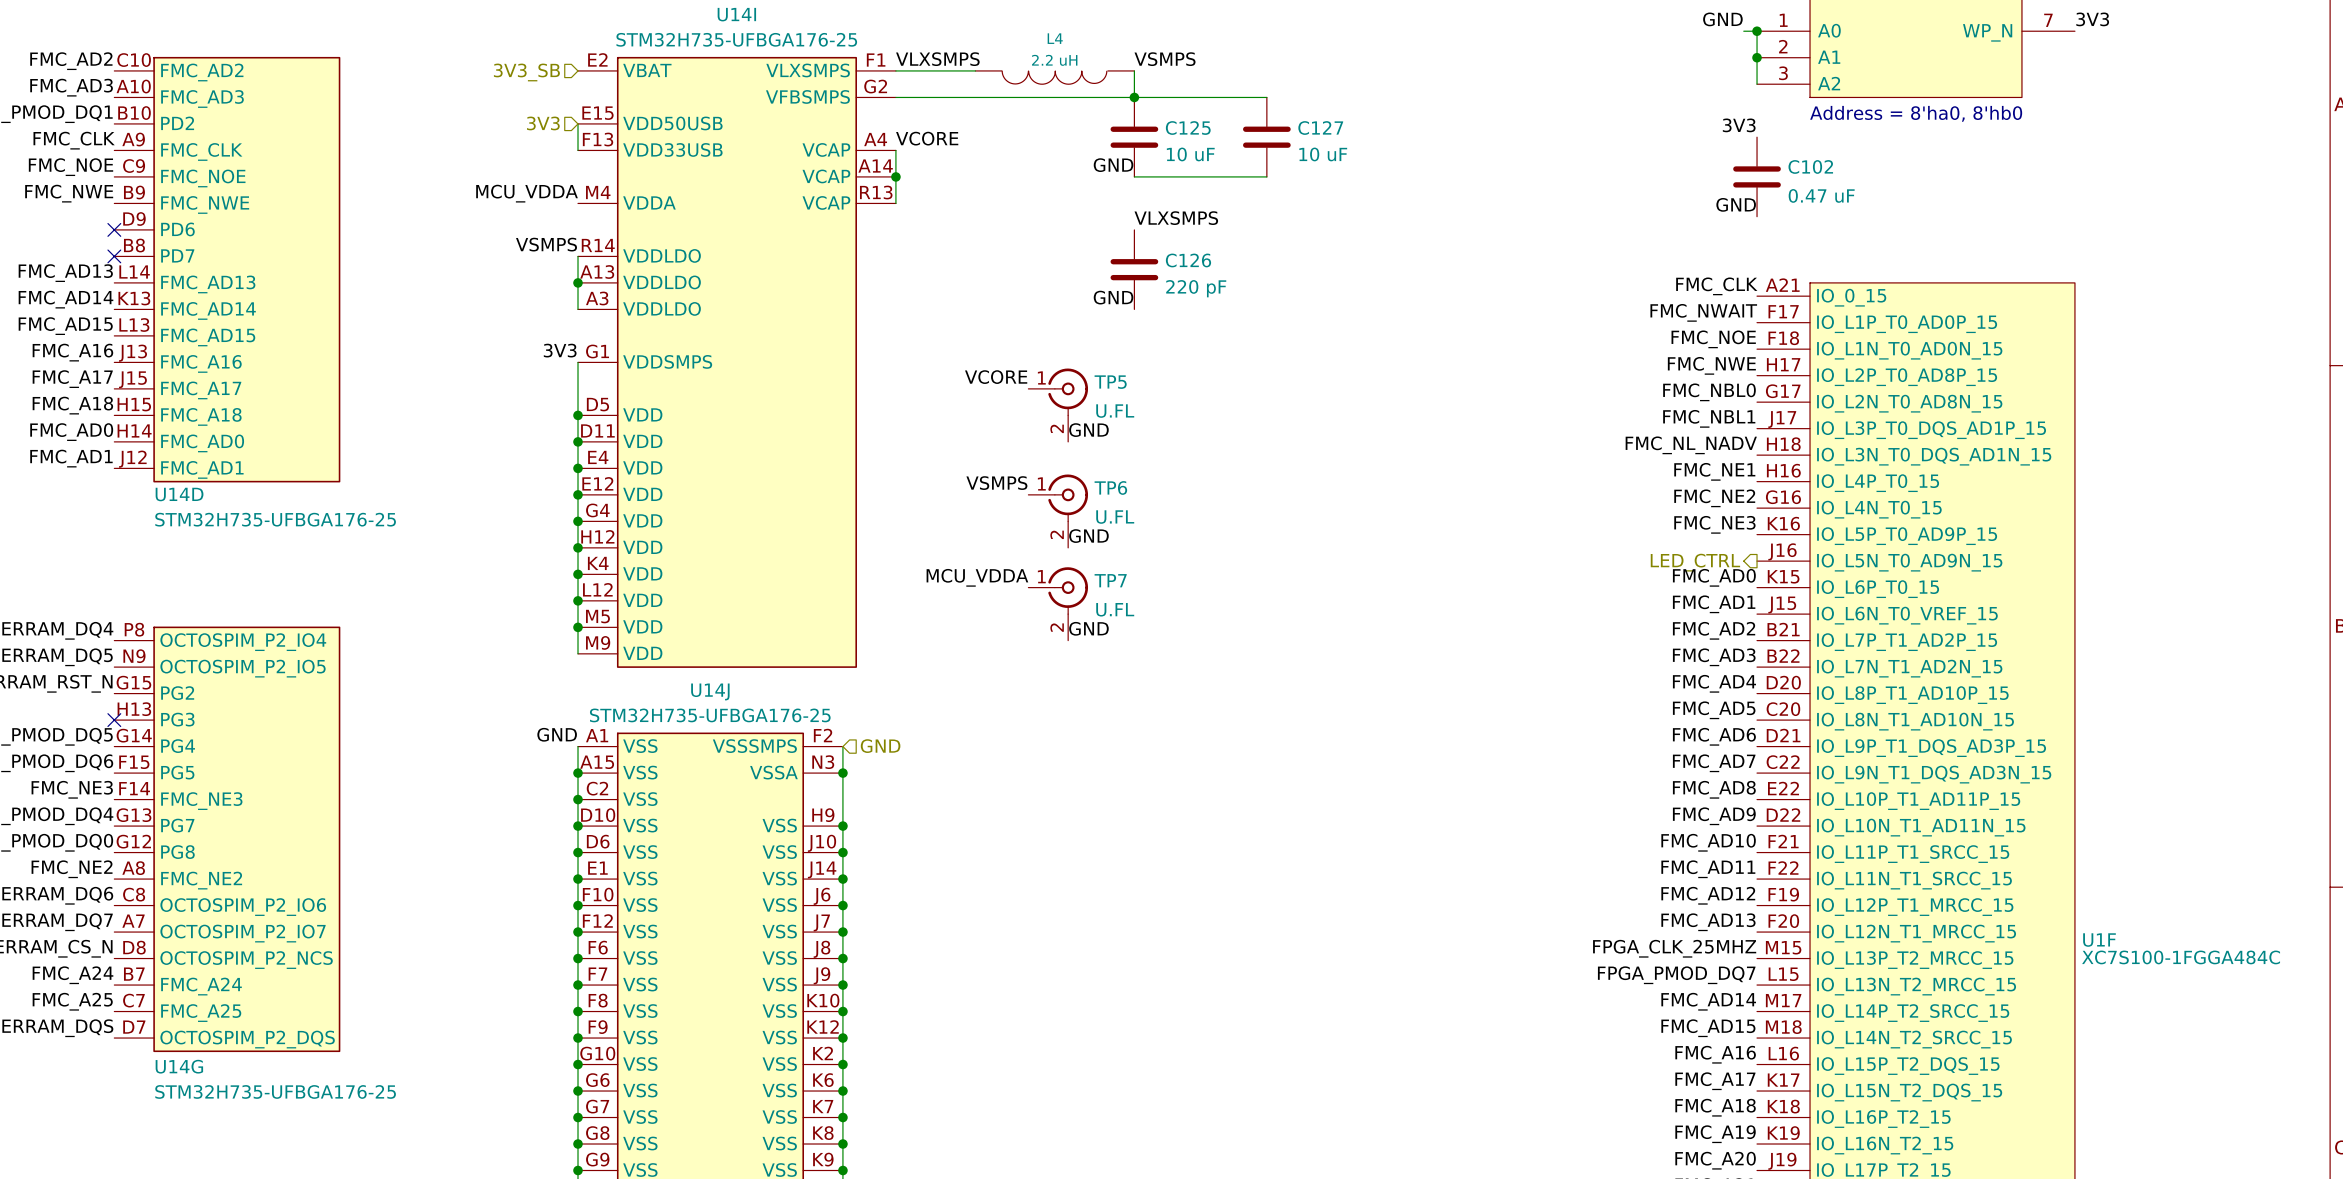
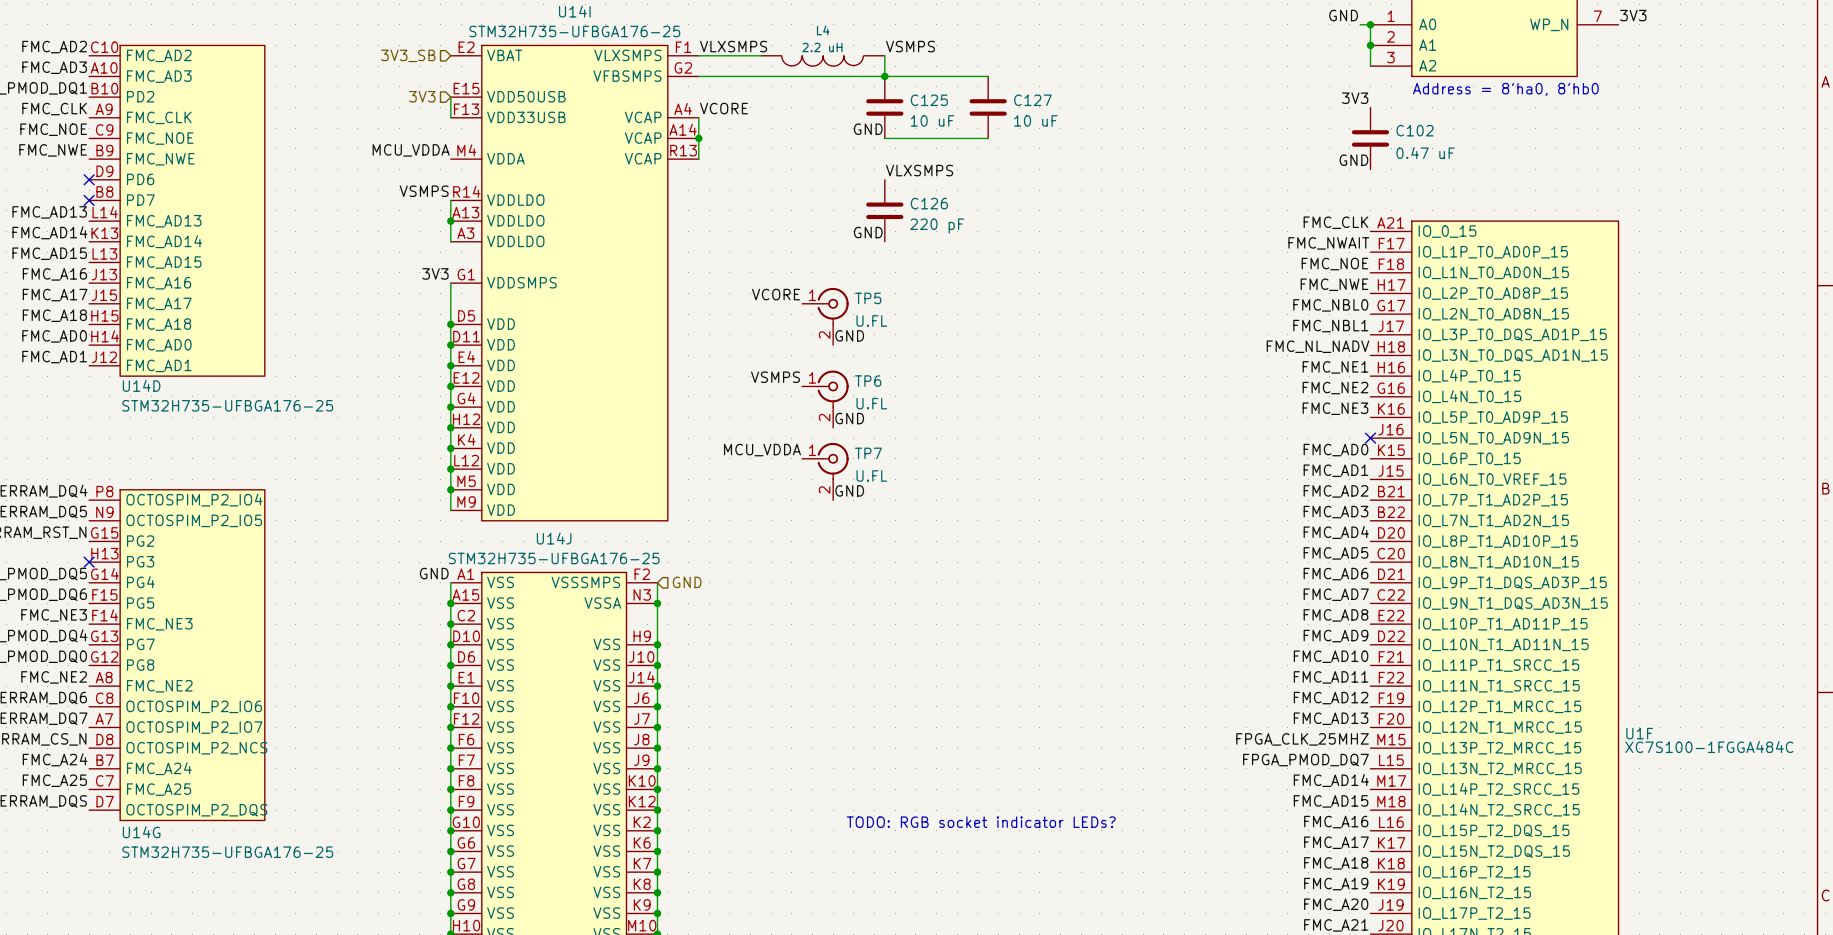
no-connect mark: none -> (1370, 438)
hierarchical label: LED_CTRL (1695, 562) -> none
text: none -> TODO: RGB socket indicator LEDs? (981, 822)

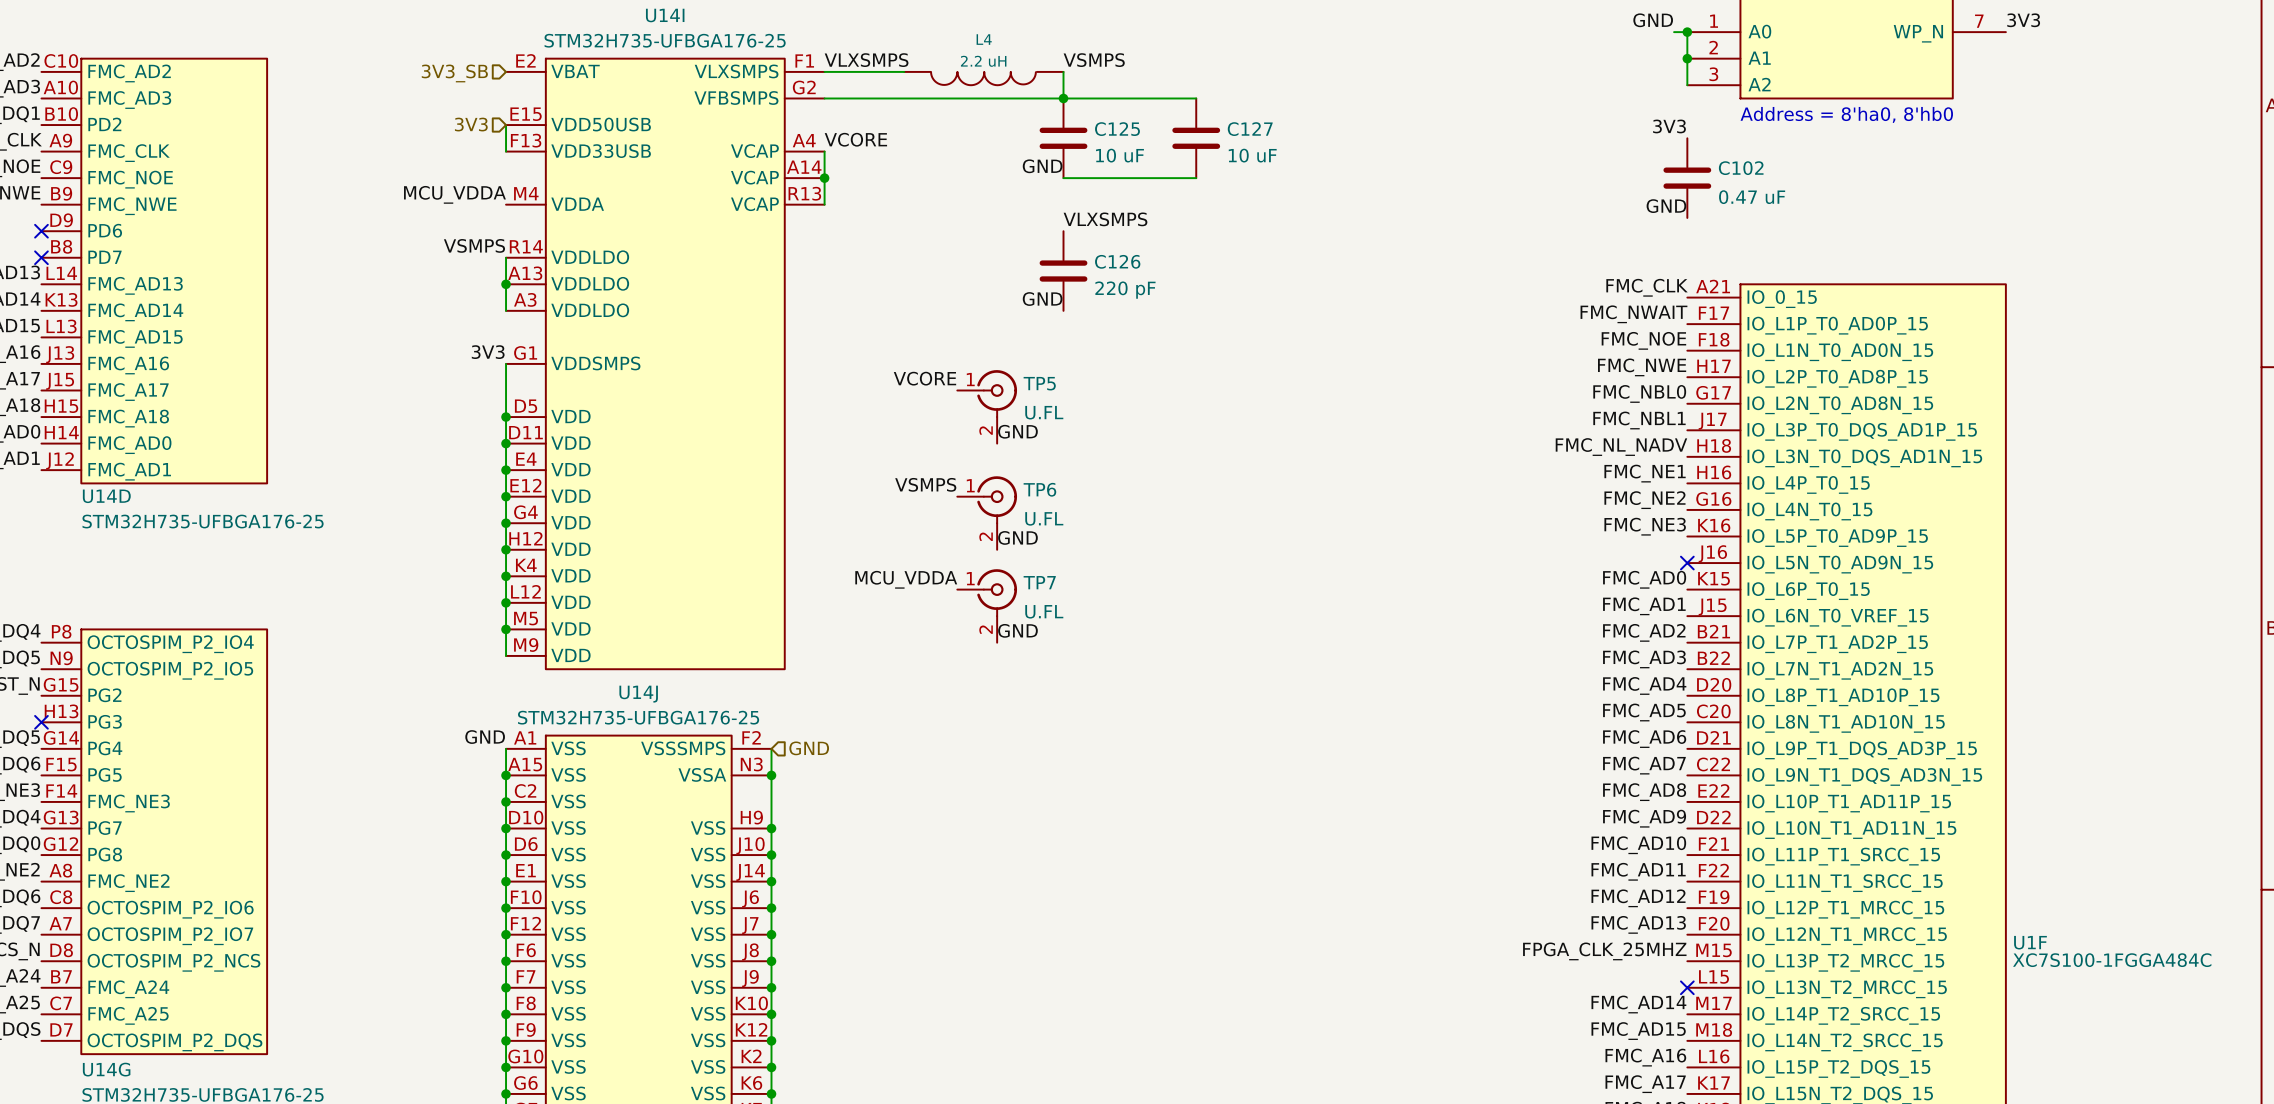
label: FPGA_PMOD_DQ7 (1305, 760) -> none
no-connect mark: none -> (1687, 987)
text: TODO: RGB socket indicator LEDs? (981, 822) -> none

